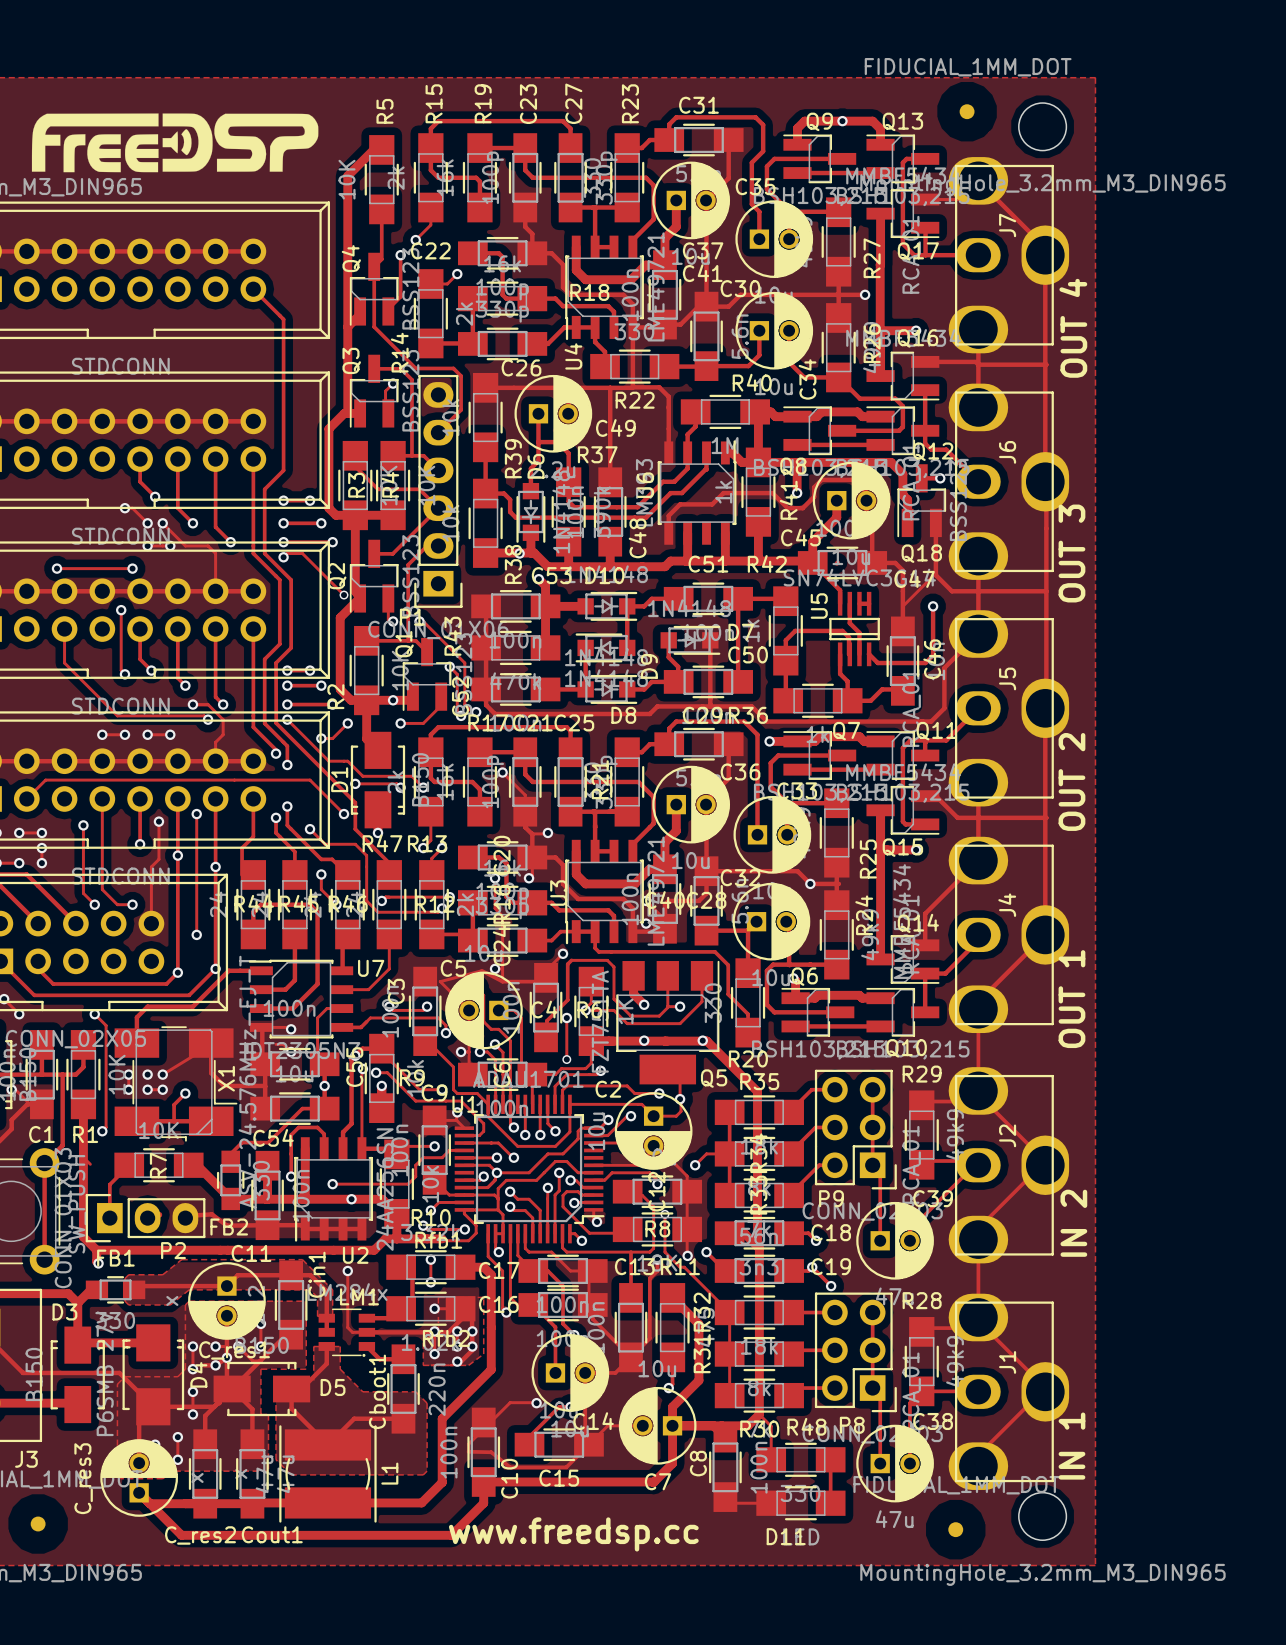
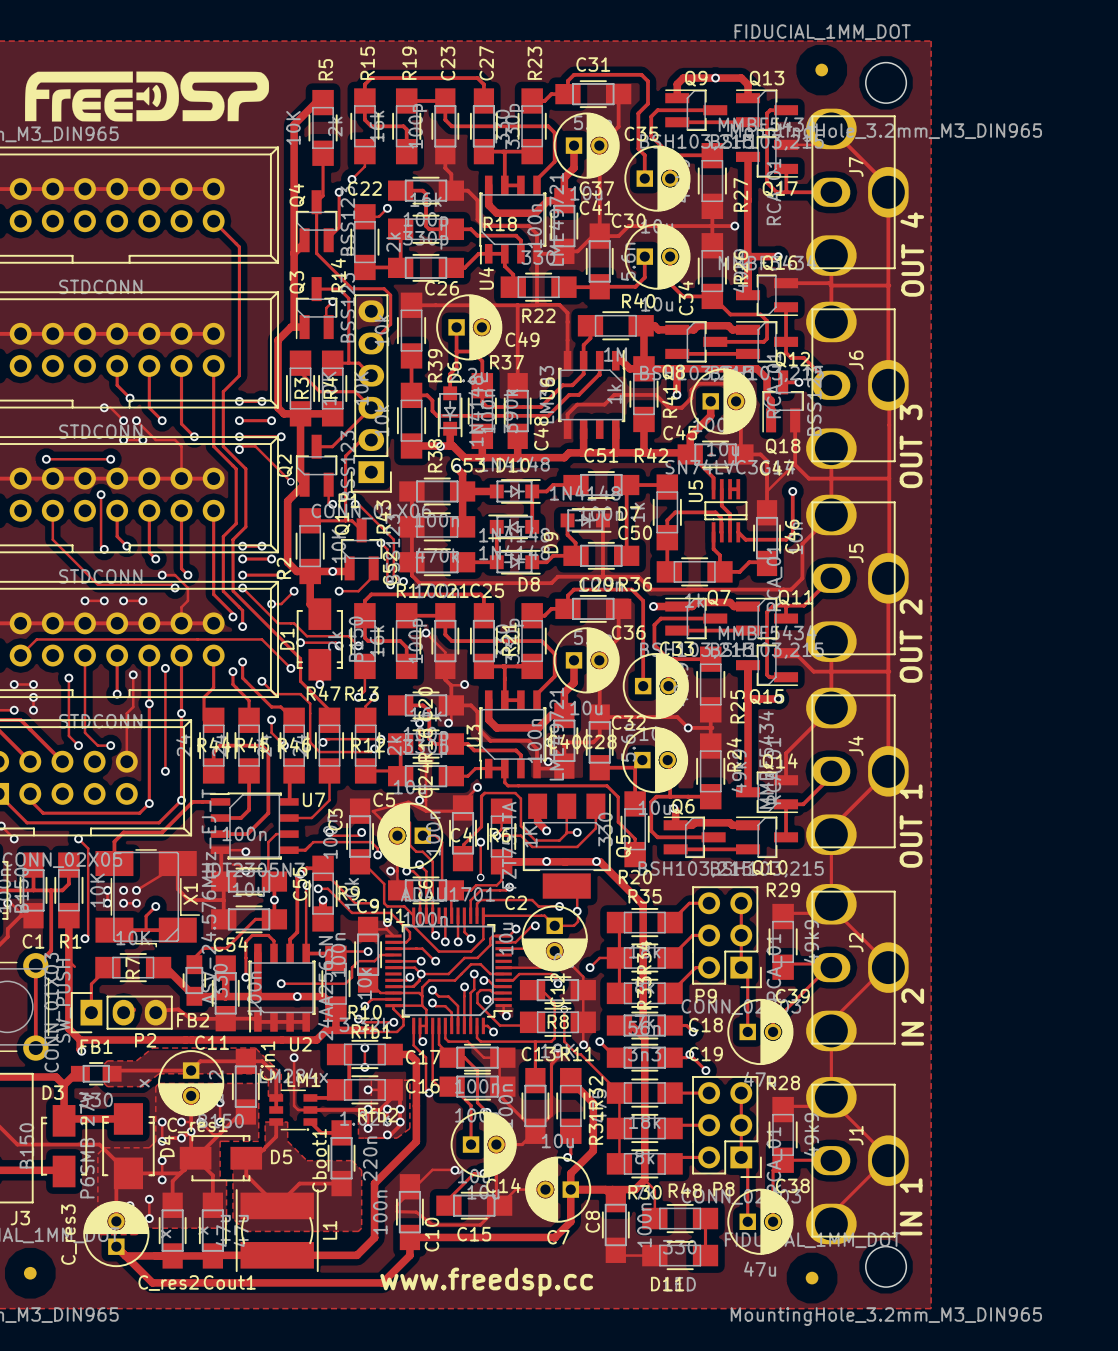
Q5 name rotation: 0° (714, 1078) -> 90° counterclockwise (623, 846)
Q5 name position: Q5 (714, 1078) -> Q5 (623, 846)

